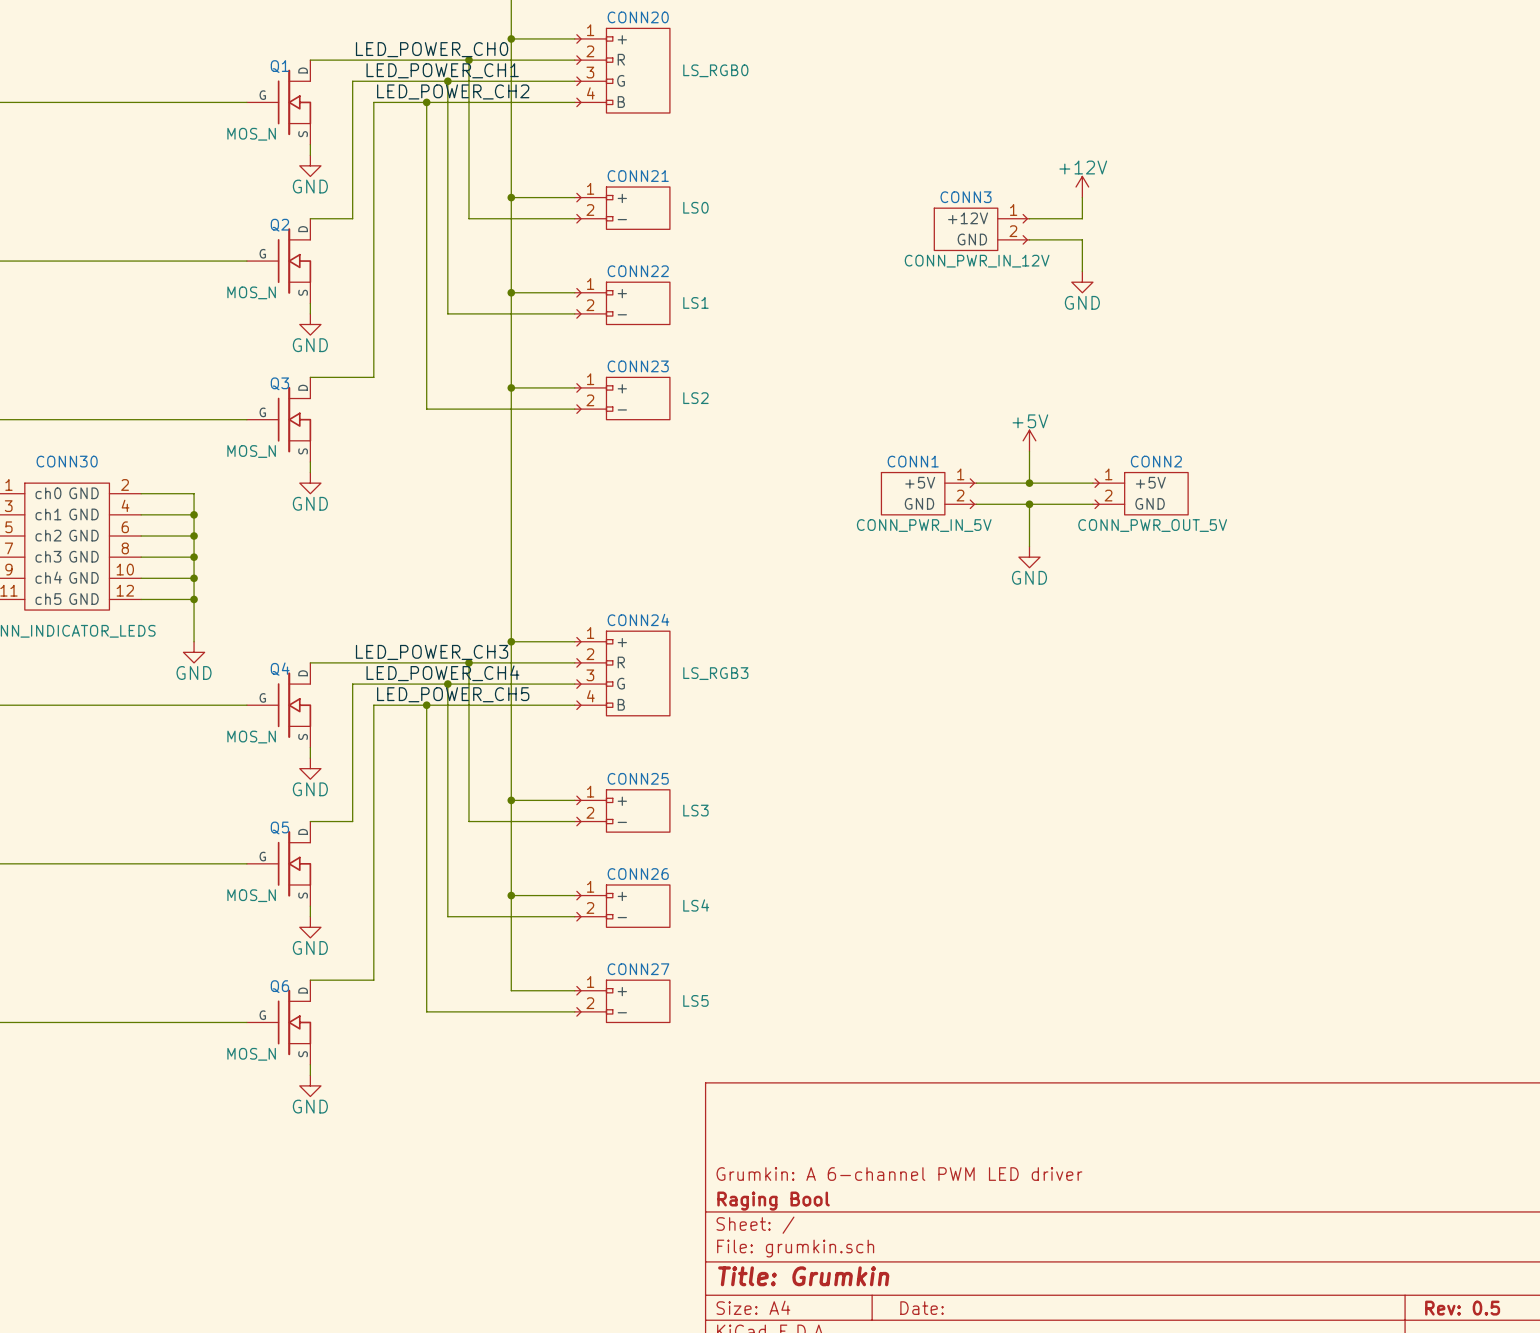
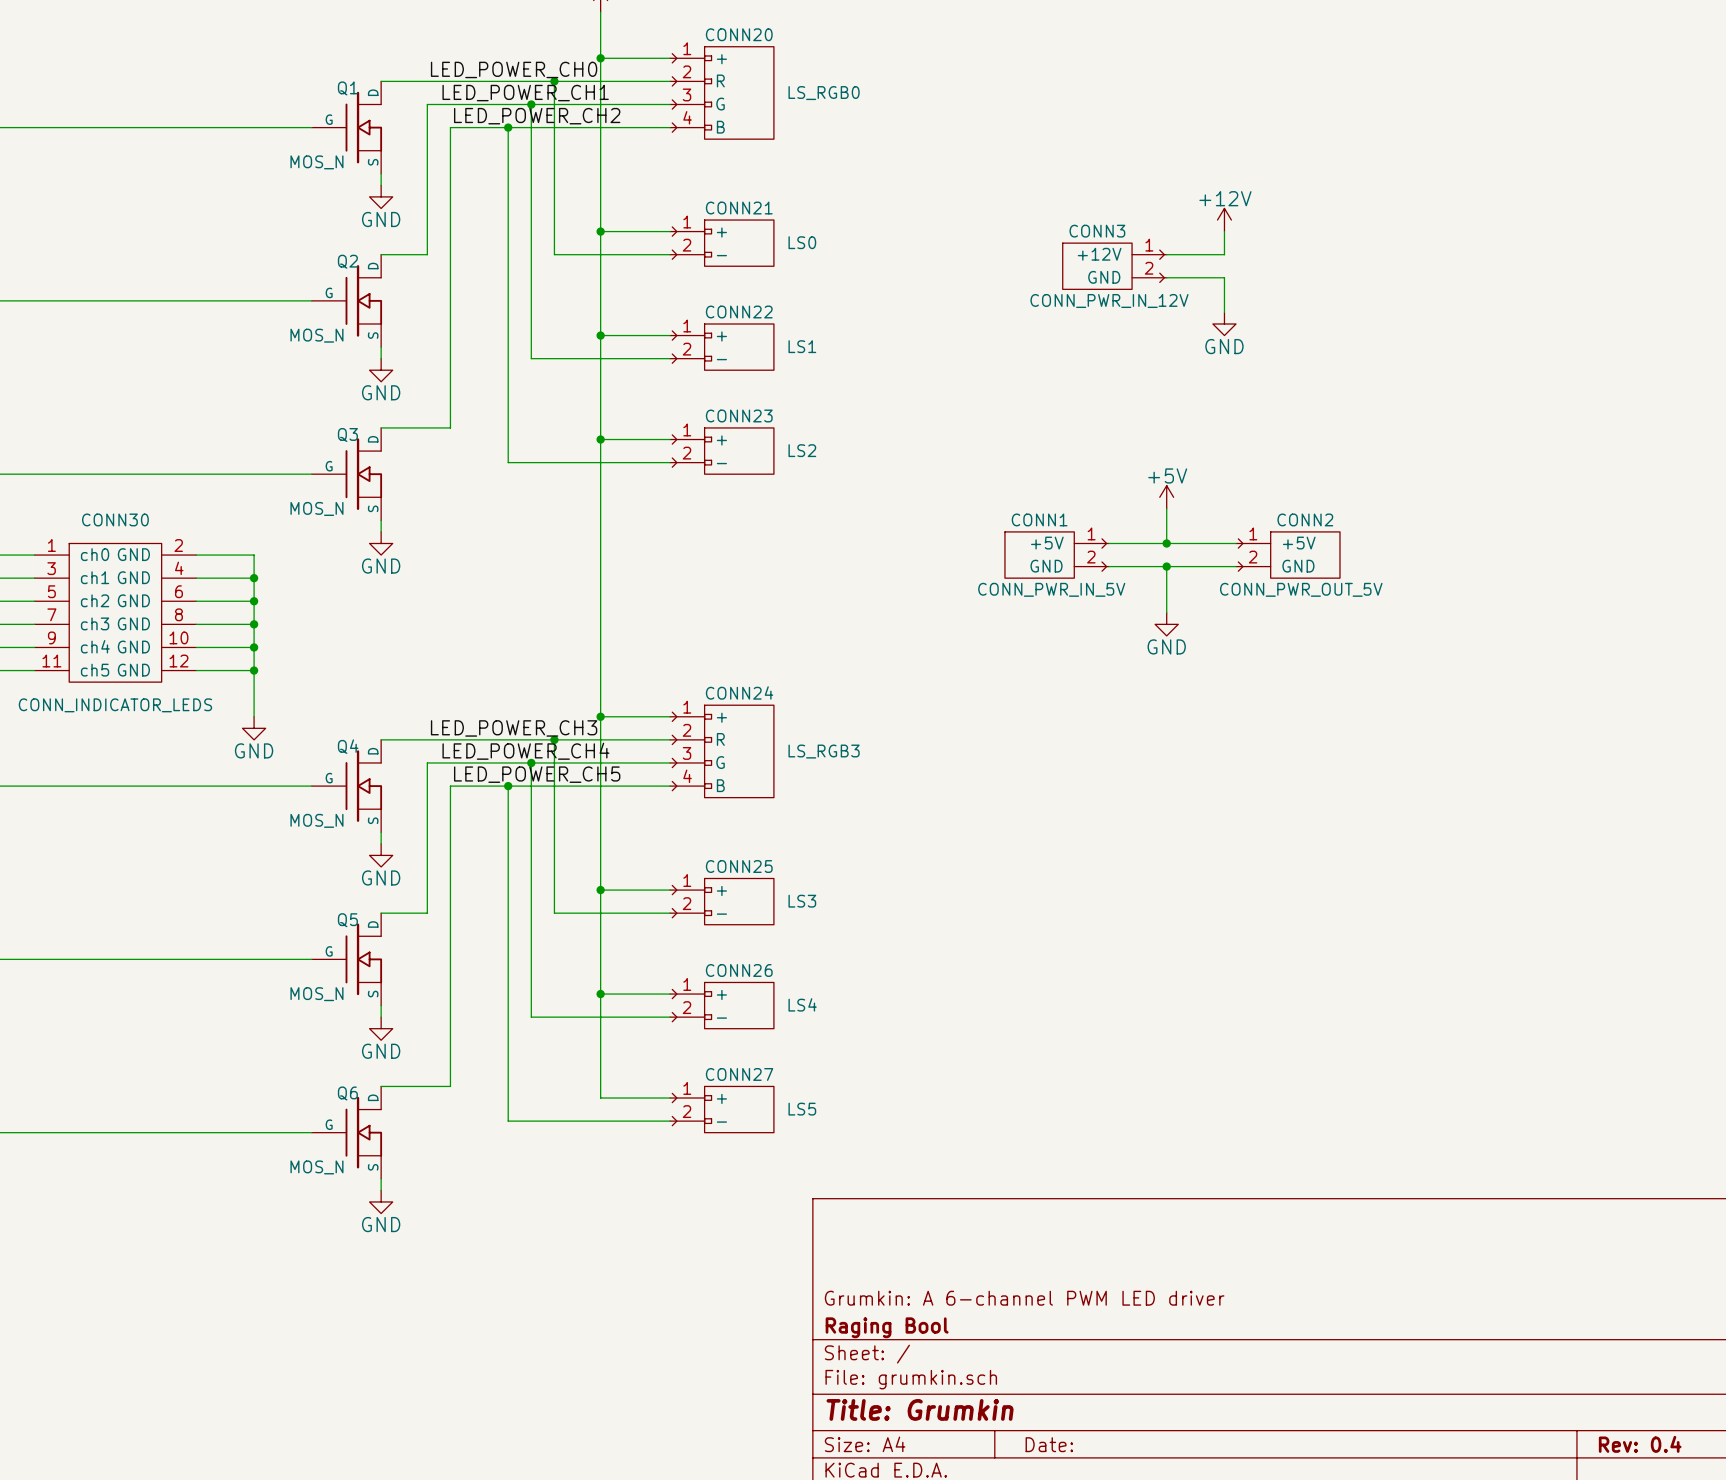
title block: Rev: 0.5 (1462, 1308) -> Rev: 0.4 (1640, 1444)

